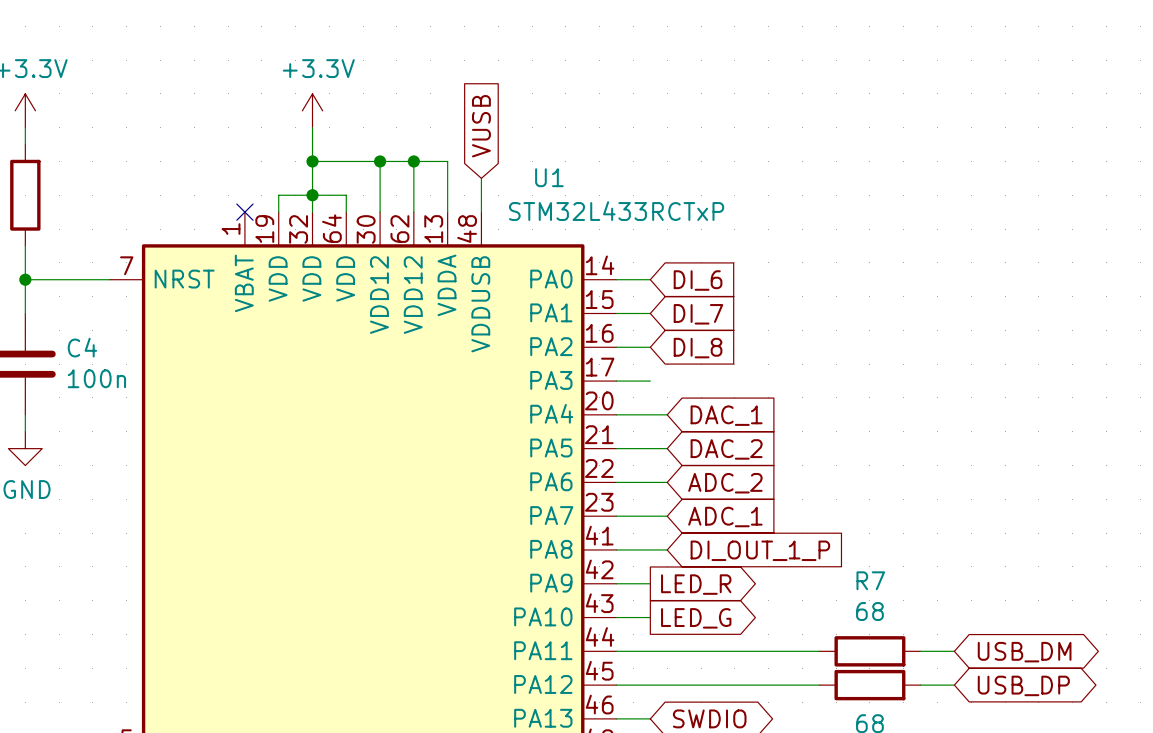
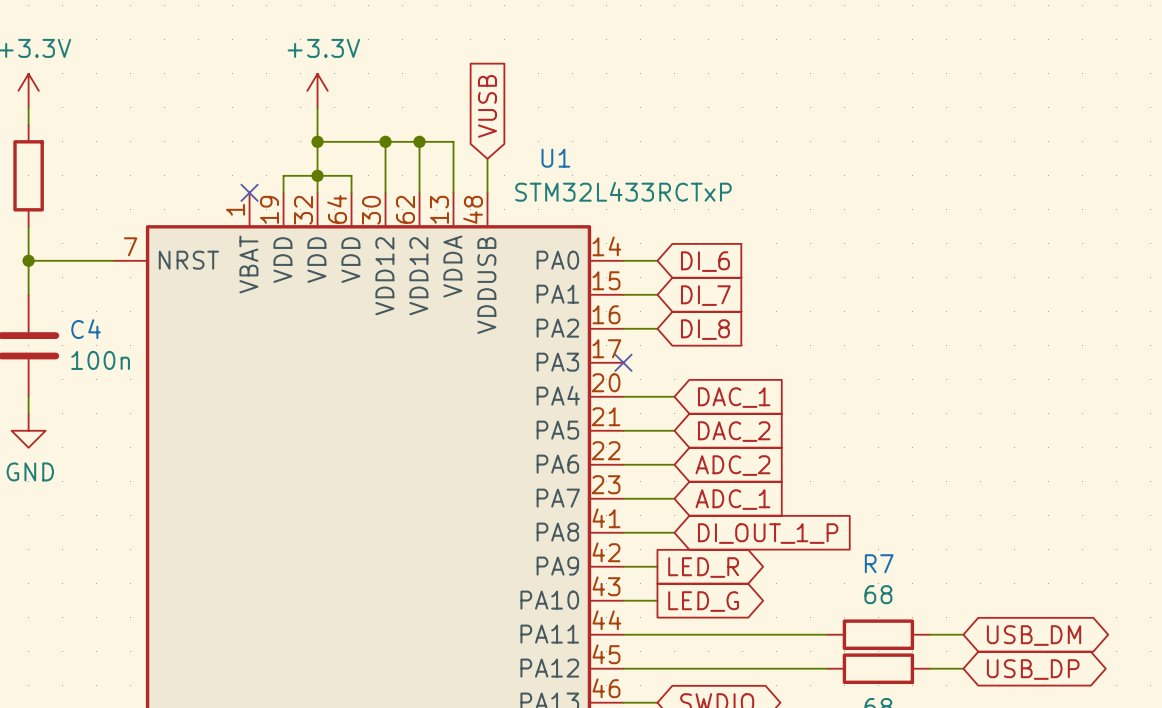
wire: (616, 381) (650, 381) -> none
no-connect mark: none -> (623, 362)

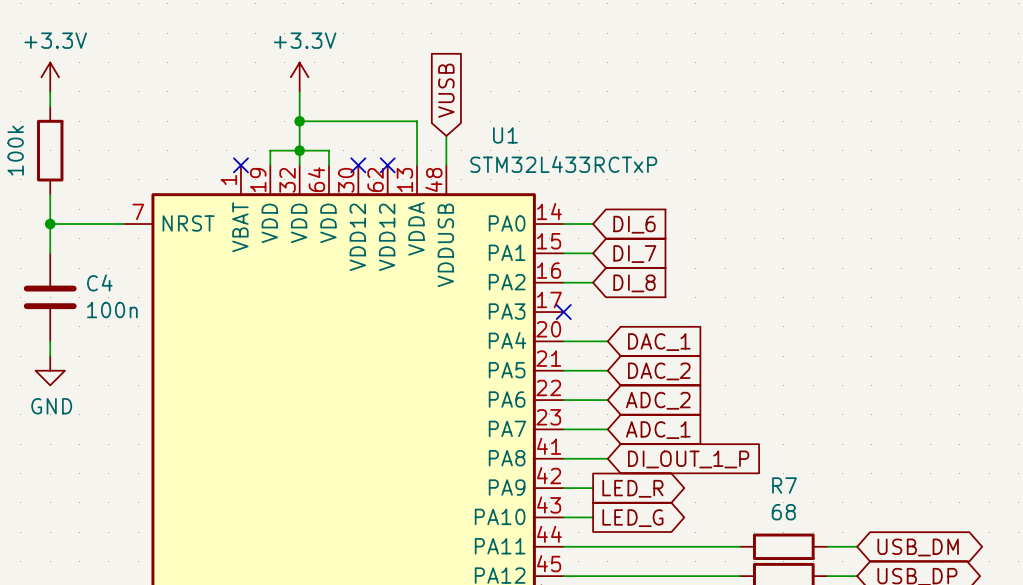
wire: (385, 141) (385, 192) -> none
junction: (385, 141) -> none
wire: (419, 141) (419, 192) -> none
junction: (419, 141) -> none
no-connect mark: none -> (358, 165)
no-connect mark: none -> (387, 165)

